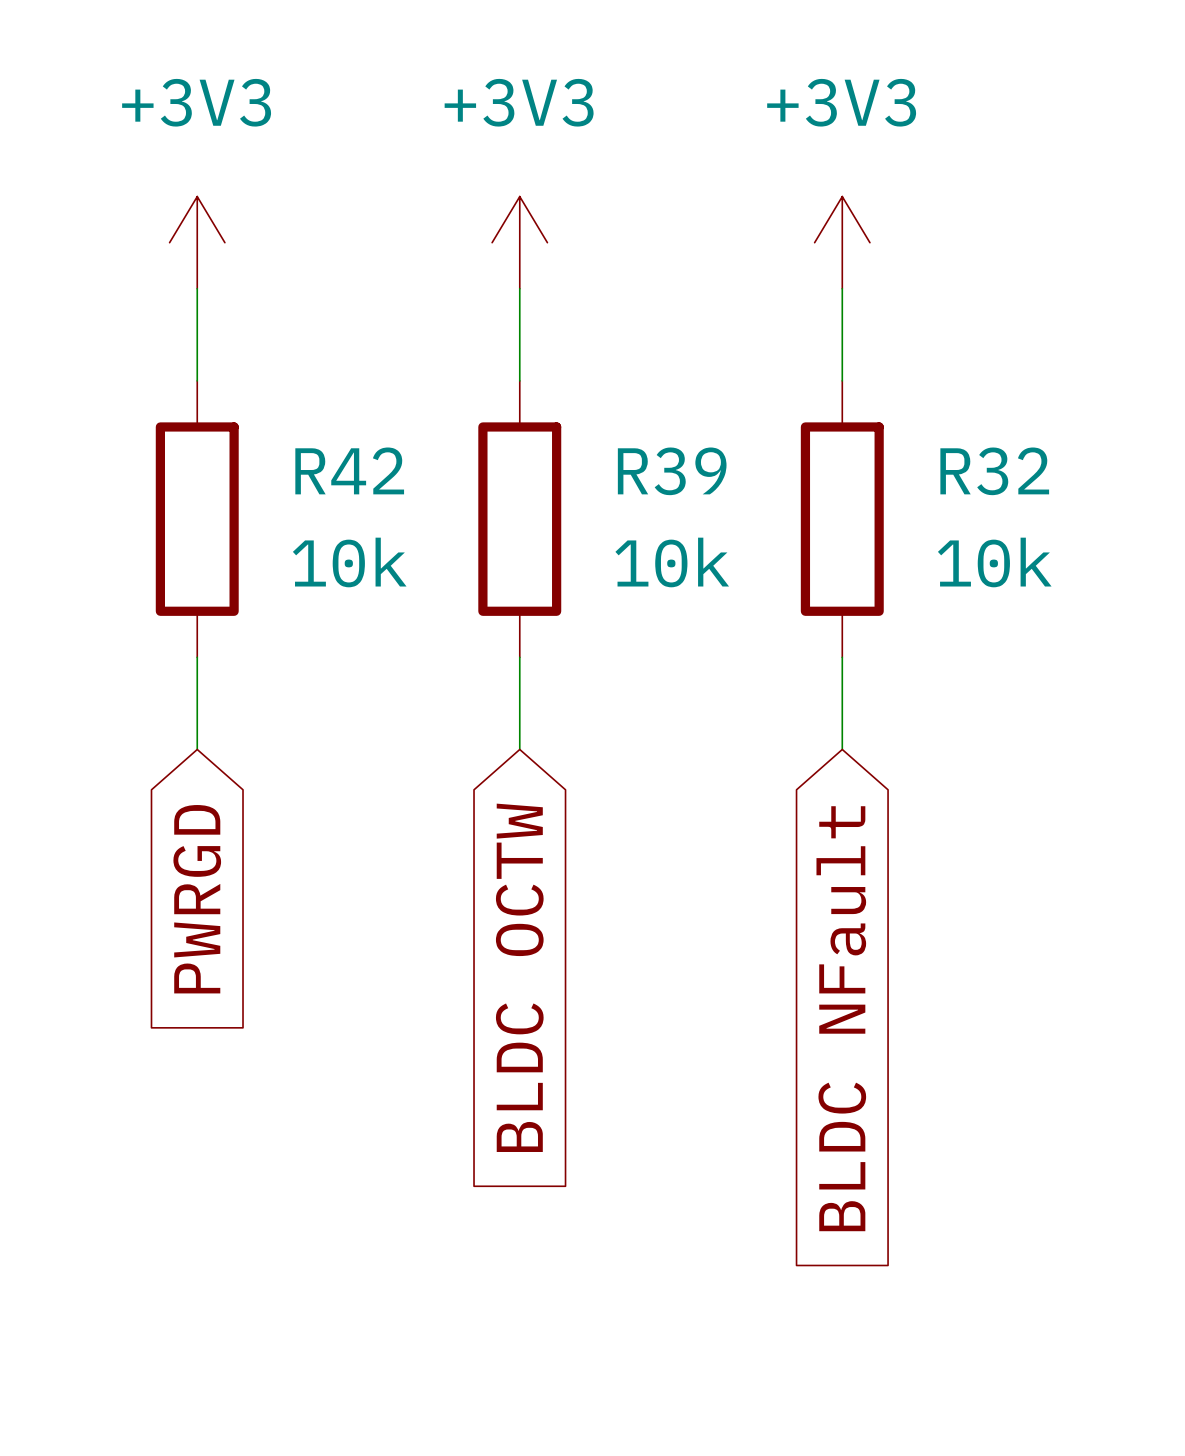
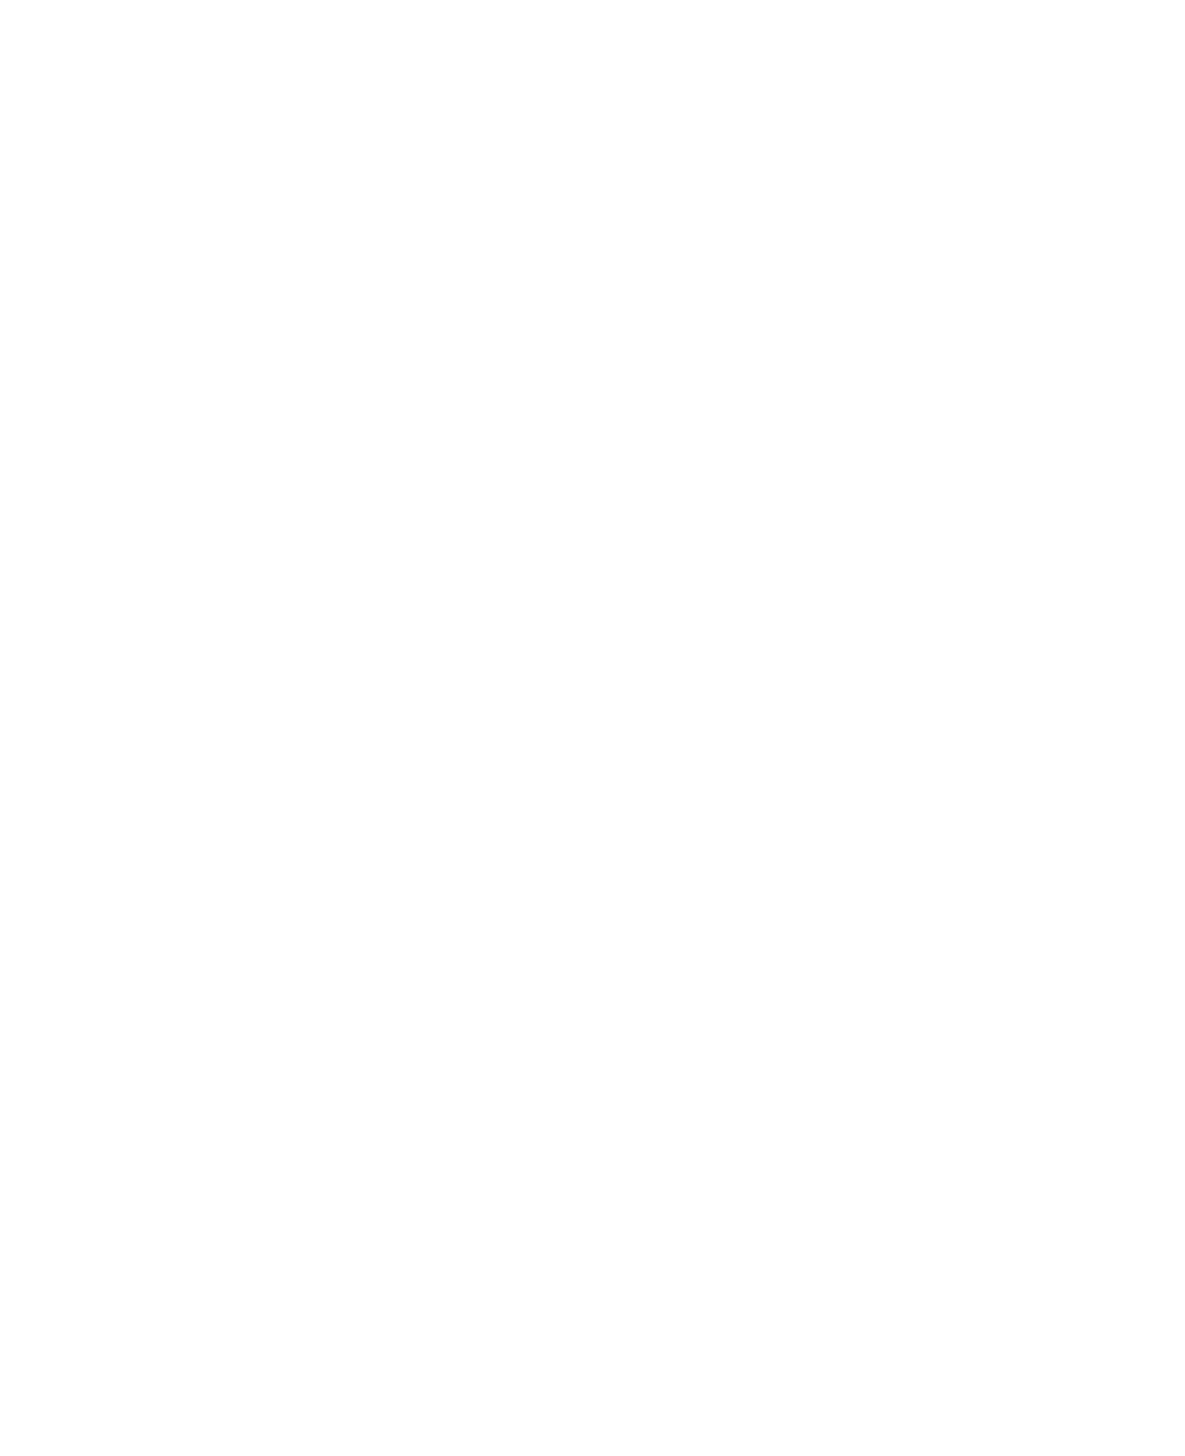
power symbol: +3V3 (197, 242) -> none
power symbol: +3V3 (519, 242) -> none
power symbol: +3V3 (842, 242) -> none
wire: (197, 288) (197, 380) -> none
wire: (519, 288) (519, 380) -> none
wire: (842, 288) (842, 380) -> none
R42: 10k (197, 519) -> none
R39: 10k (519, 519) -> none
R32: 10k (842, 519) -> none
wire: (197, 657) (197, 749) -> none
wire: (519, 657) (519, 749) -> none
wire: (842, 657) (842, 749) -> none
global label: PWRGD (197, 899) -> none
global label: BLDC OCTW (519, 977) -> none
global label: BLDC NFault (841, 1018) -> none

